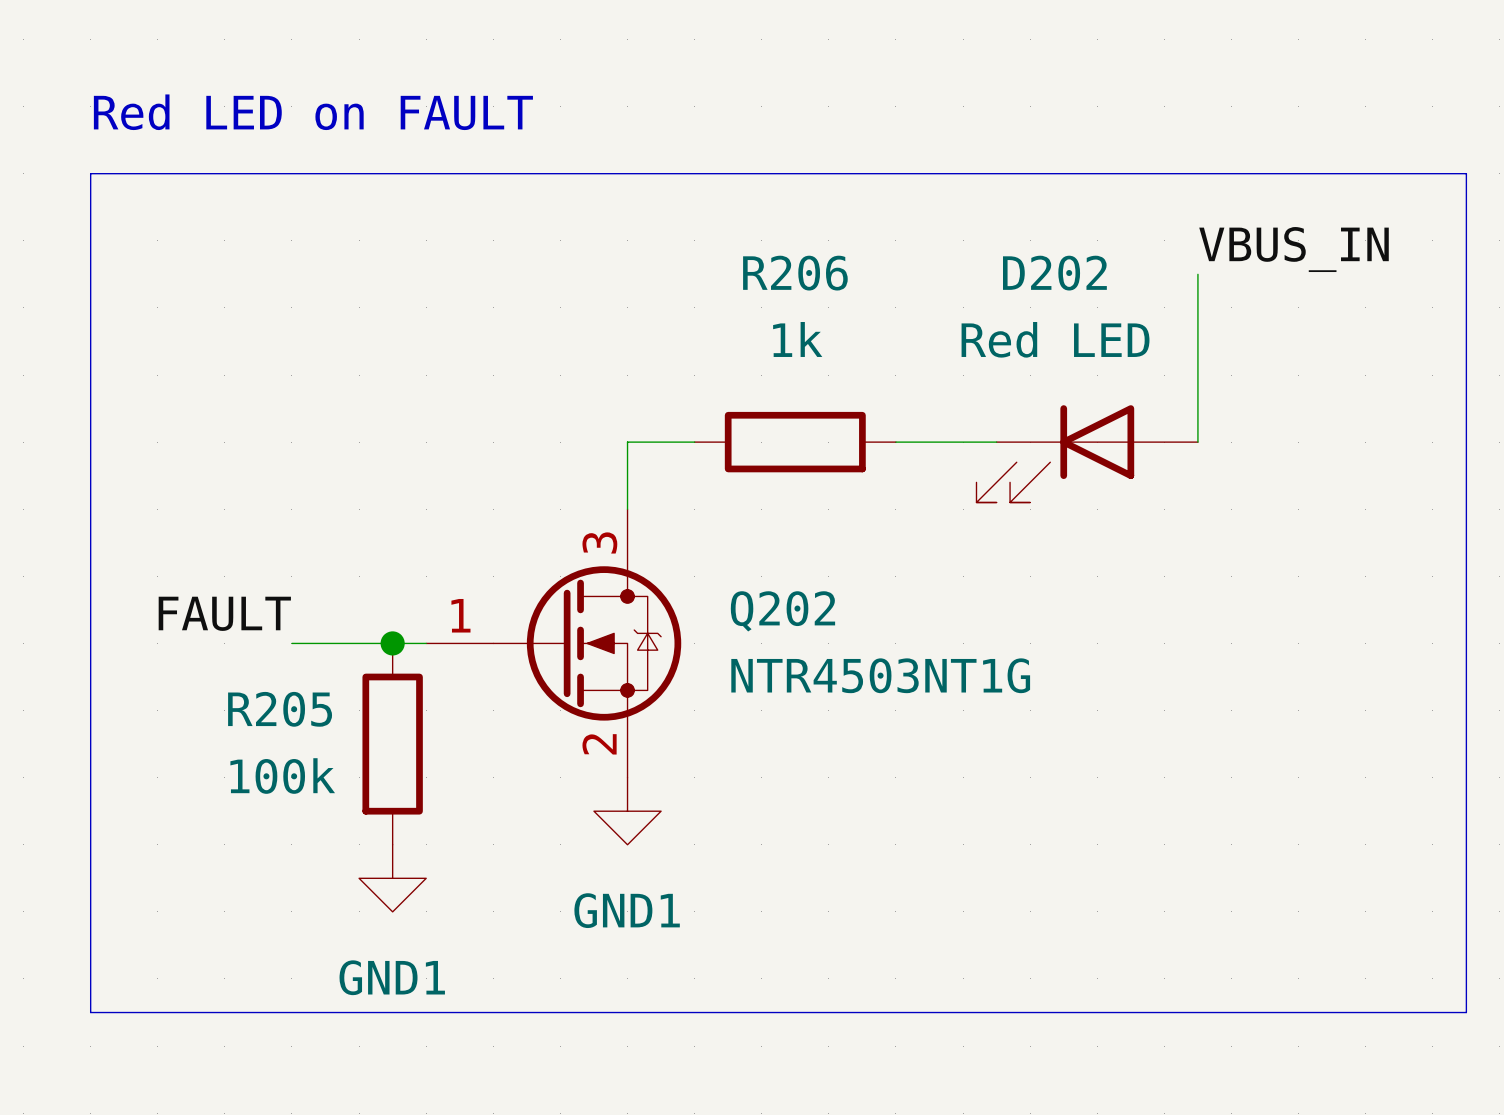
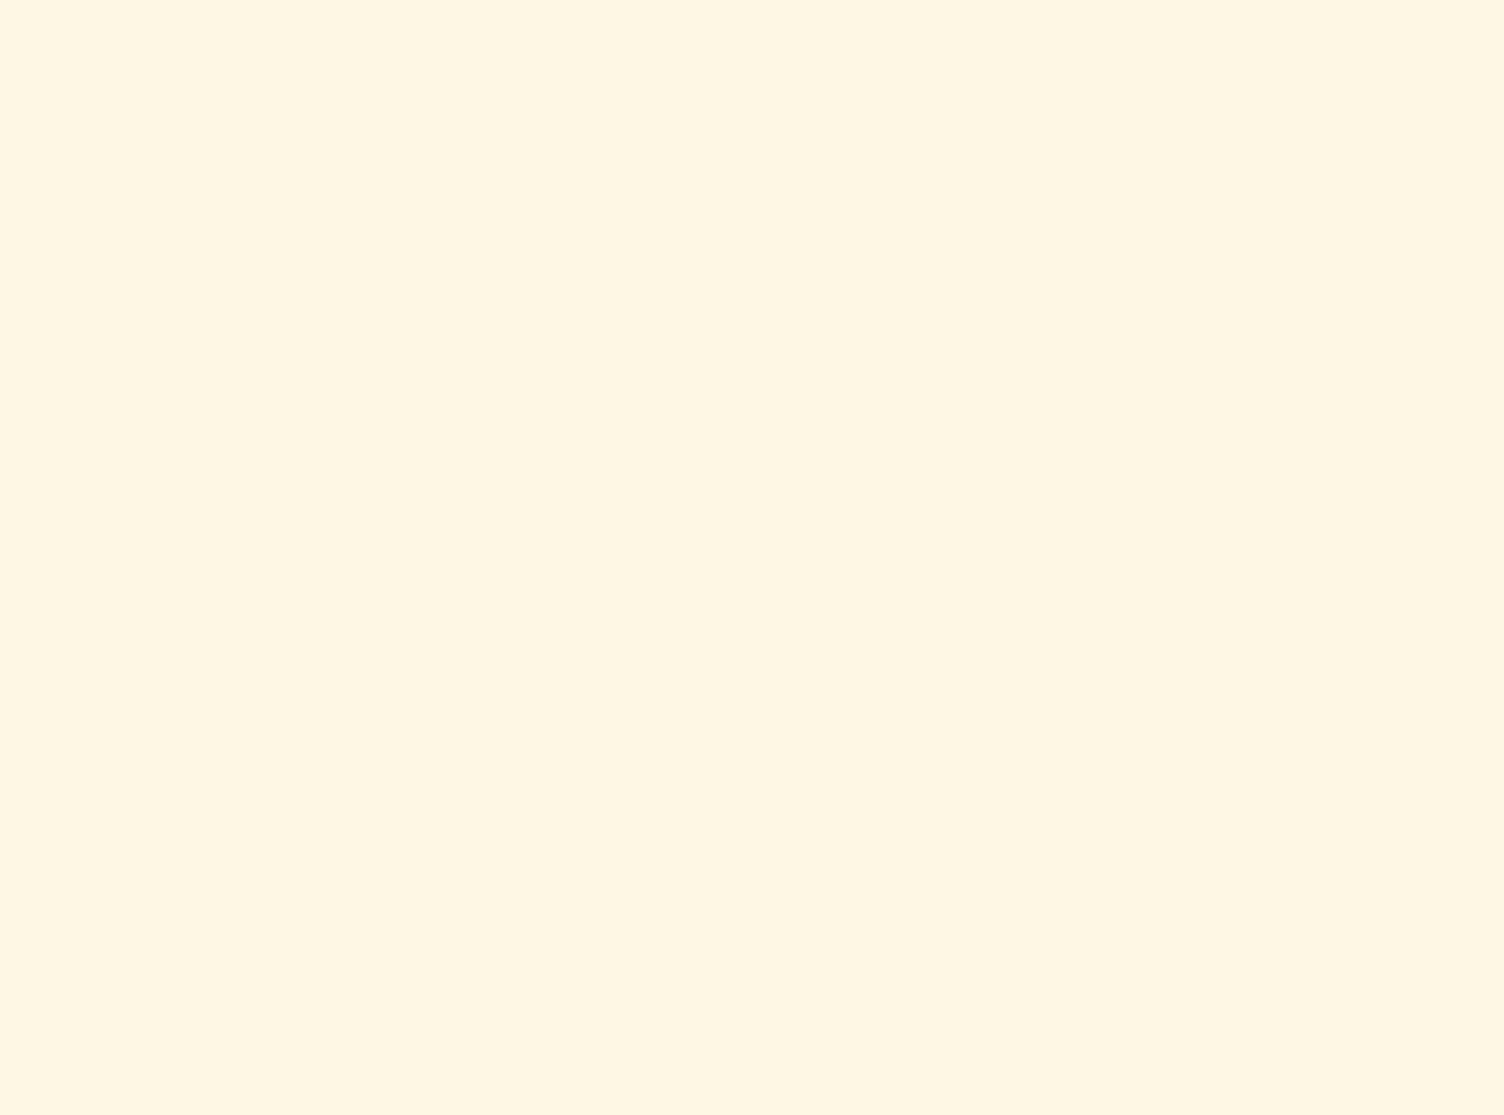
text: Red LED on FAULT (313, 112) -> none
line: (90, 173) (1466, 173) (1466, 1012) (90, 1012) (90, 173) -> none
label: VBUS_IN (1294, 249) -> none
wire: (1197, 274) (1197, 442) -> none
wire: (694, 442) (627, 442) (627, 509) -> none
R206: 1k (795, 442) -> none
wire: (895, 442) (996, 442) -> none
D202: Red LED (1087, 453) -> none
label: FAULT (224, 613) -> none
wire: (291, 643) (426, 643) -> none
junction: (392, 643) -> none
Q202: NTR4503NT1G (553, 643) -> none
R205: 100k (392, 744) -> none
power symbol: GND1 (627, 811) -> none
power symbol: GND1 (392, 878) -> none

